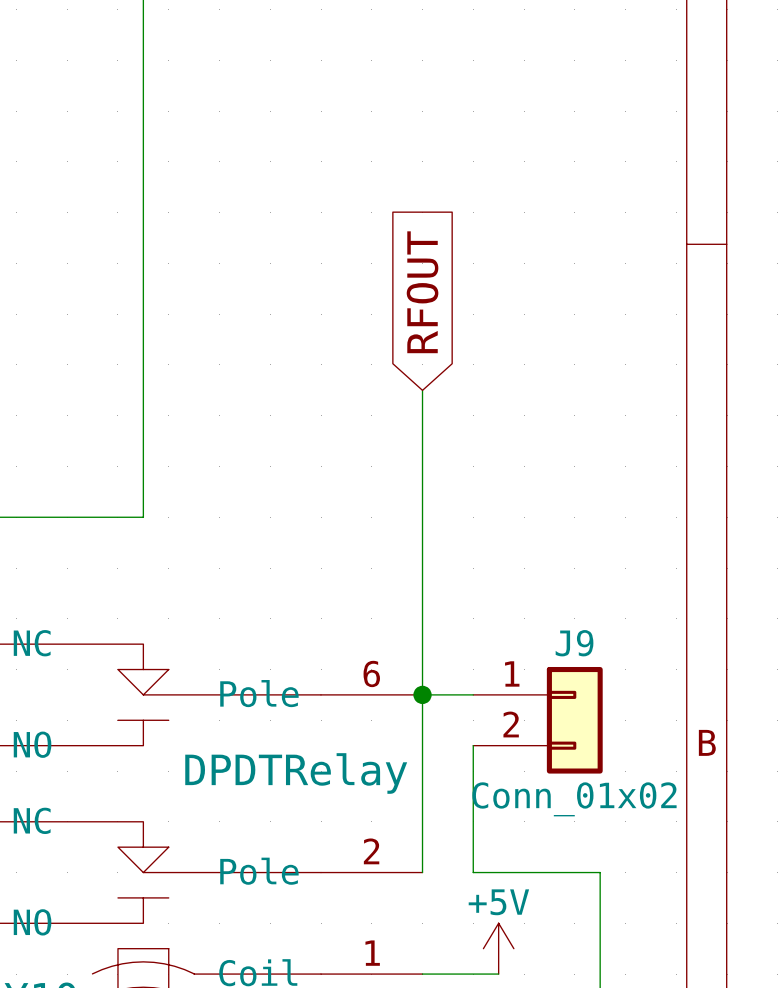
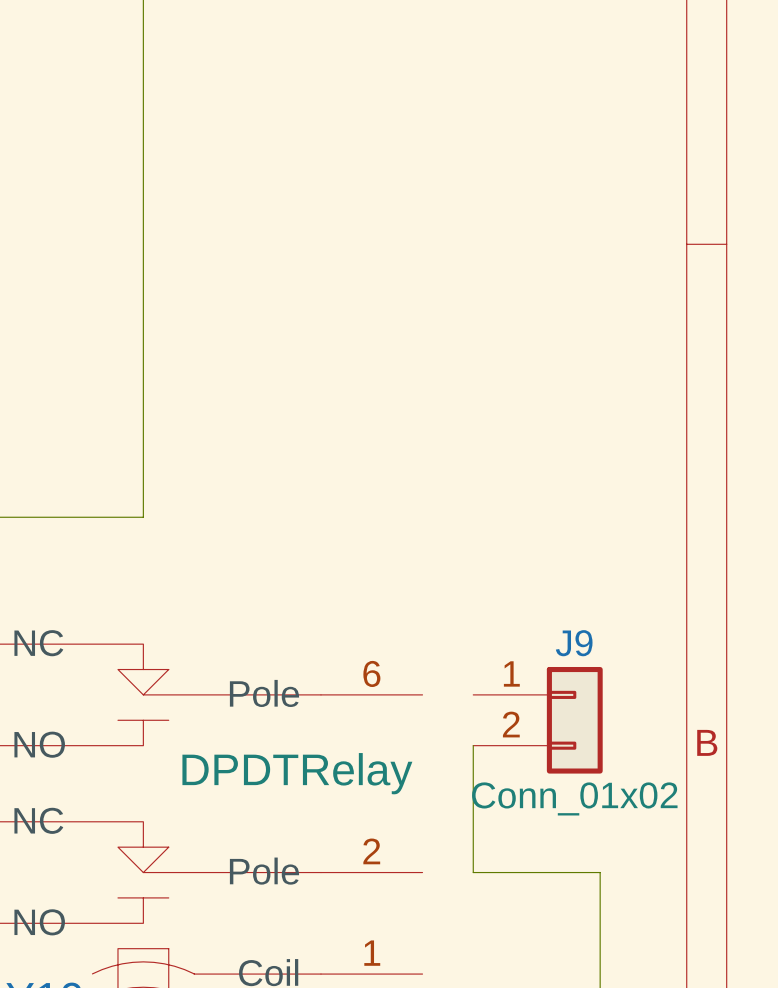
global label: RFOUT (422, 292) -> none
wire: (422, 390) (422, 872) -> none
wire: (422, 694) (473, 694) -> none
junction: (422, 694) -> none
power symbol: +5V (498, 948) -> none
wire: (422, 974) (498, 974) -> none

